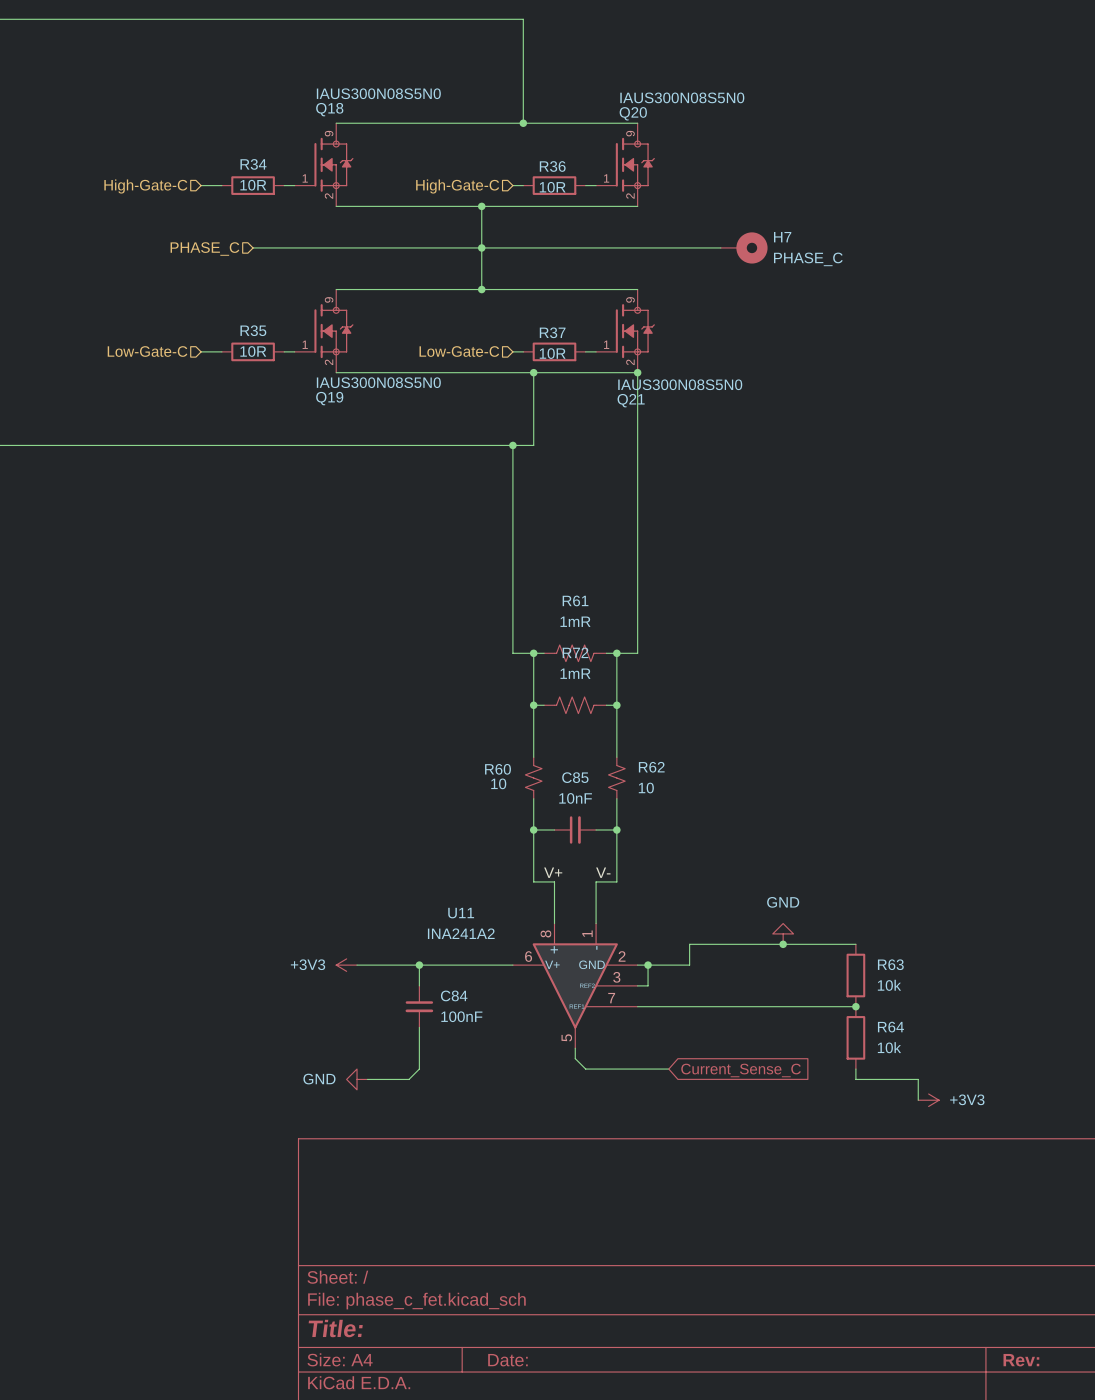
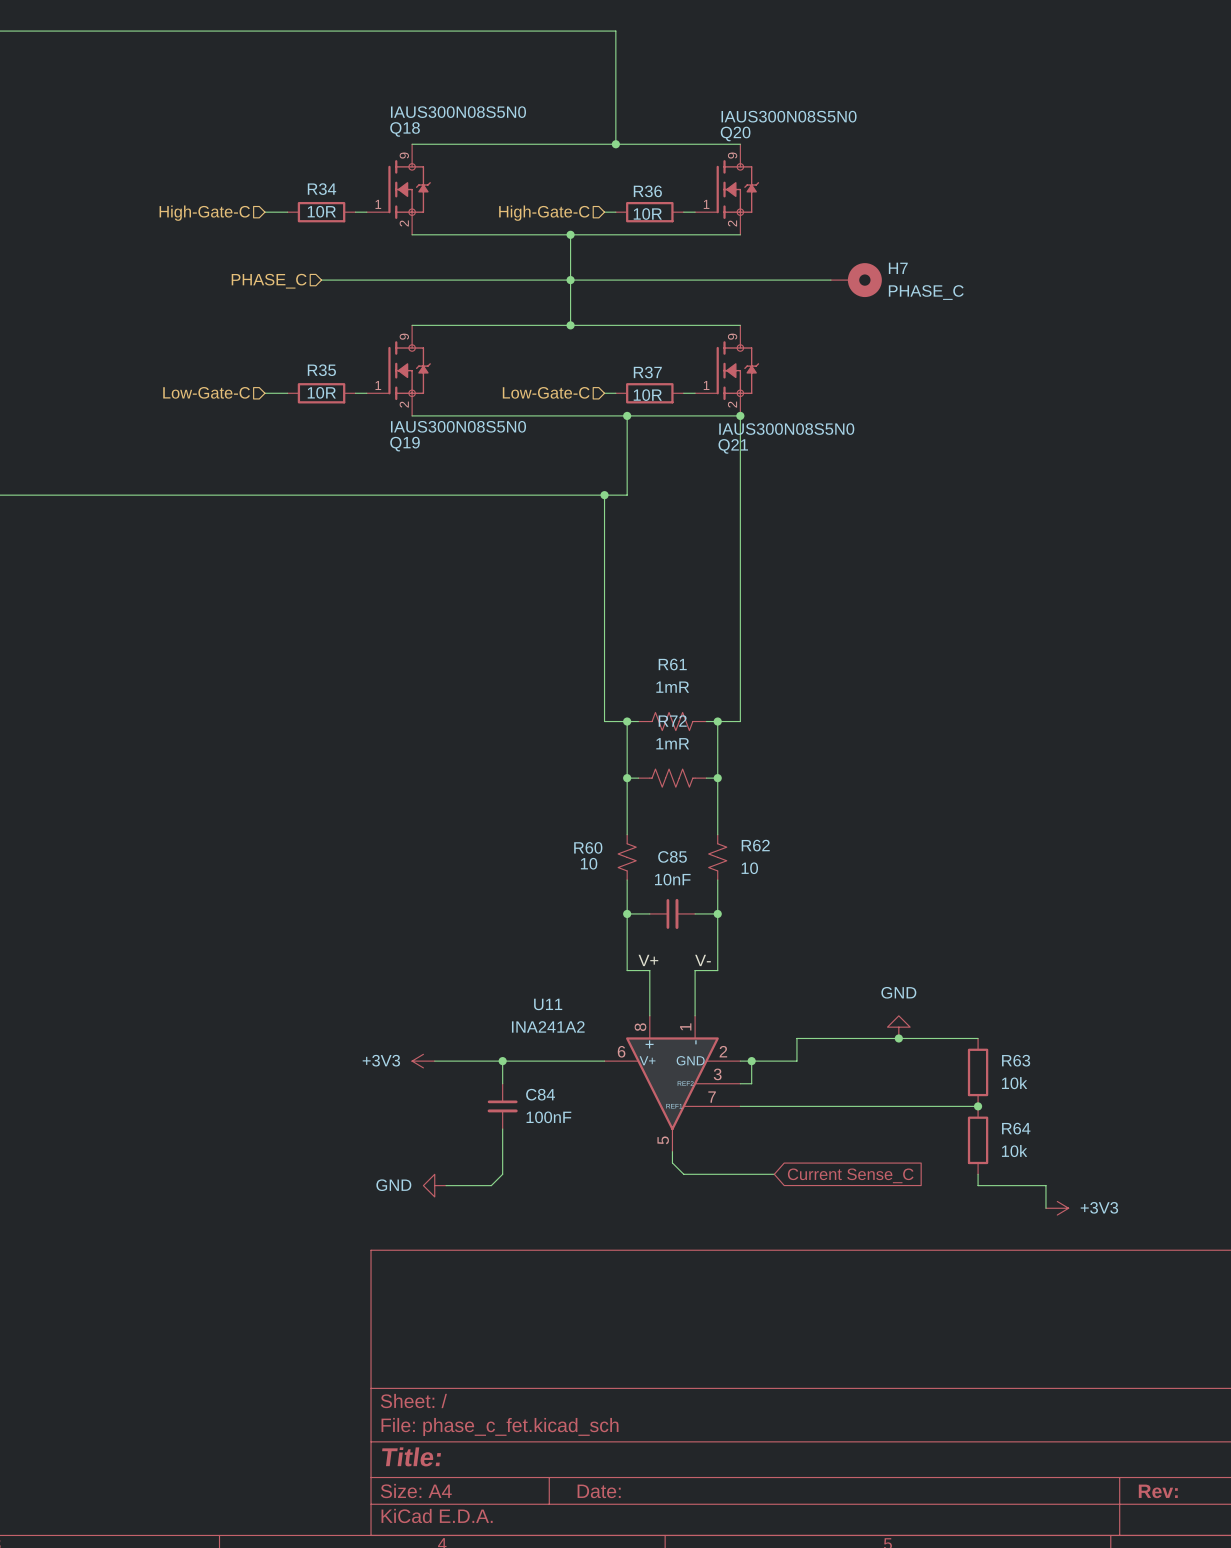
global label: Current_Sense_C (741, 1070) -> Current Sense_C (850, 1175)

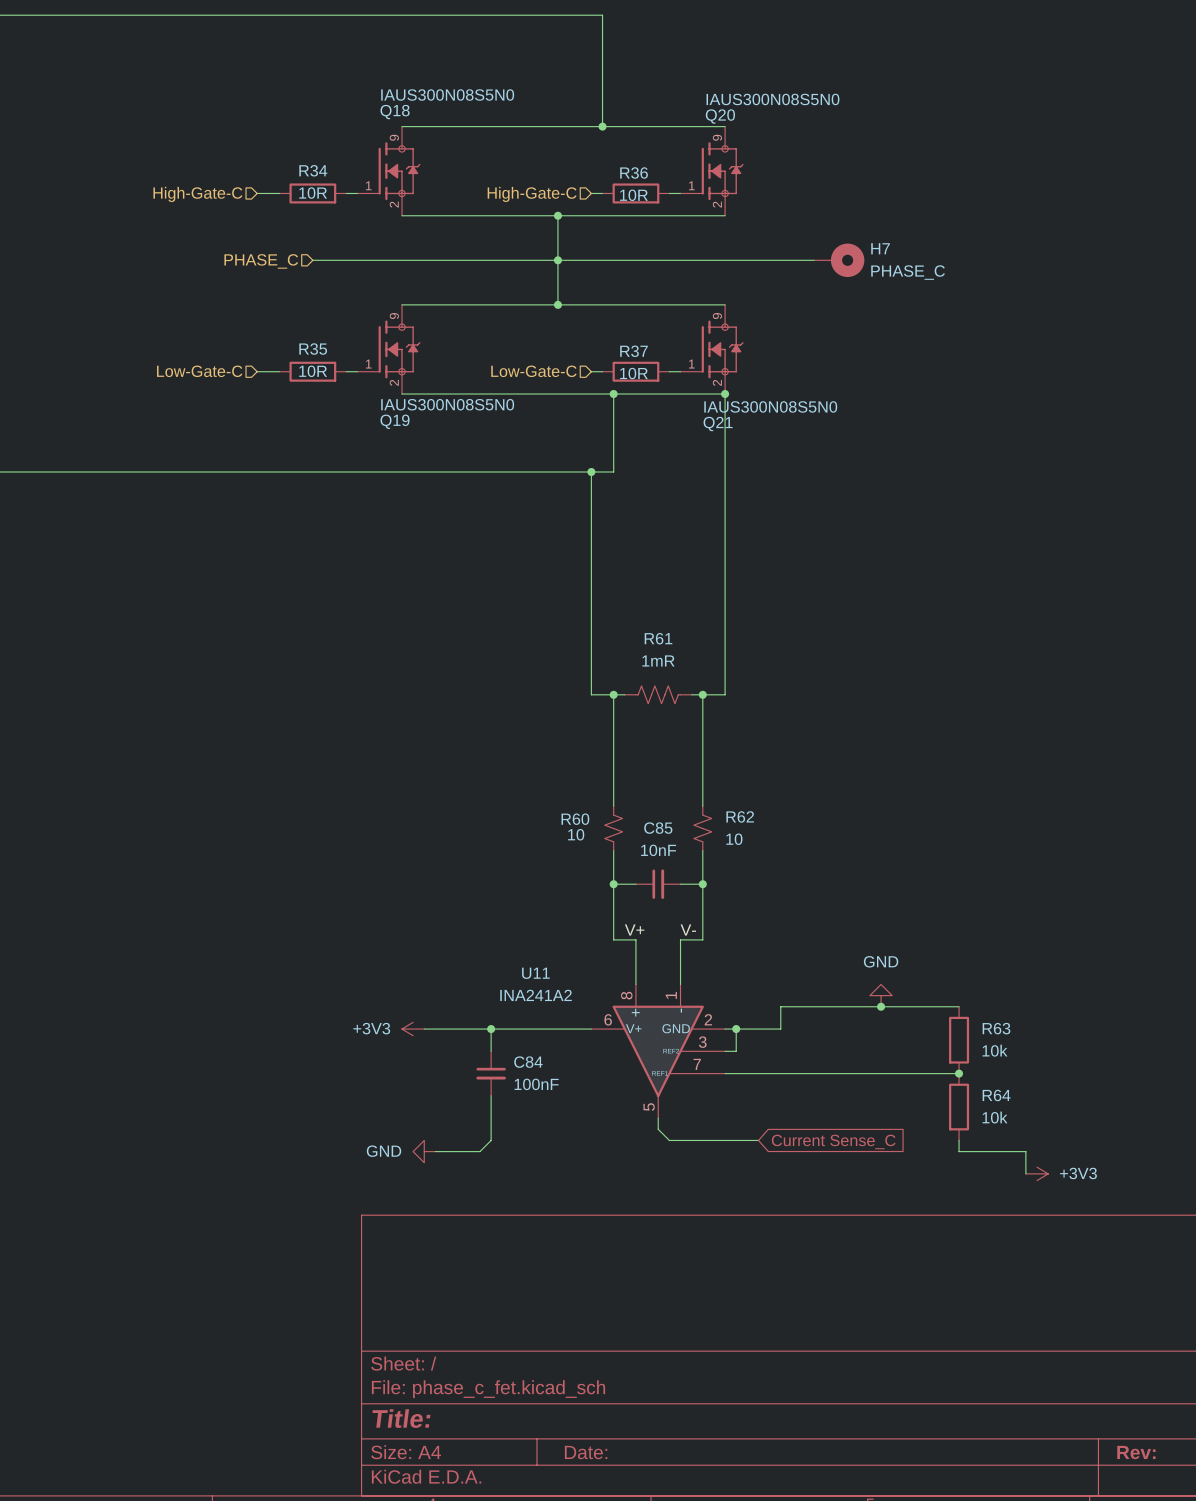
wire: (627, 778) (638, 778) -> none
junction: (627, 778) -> none
R72: 1mR (672, 778) -> none
wire: (706, 778) (717, 778) -> none
junction: (717, 778) -> none

